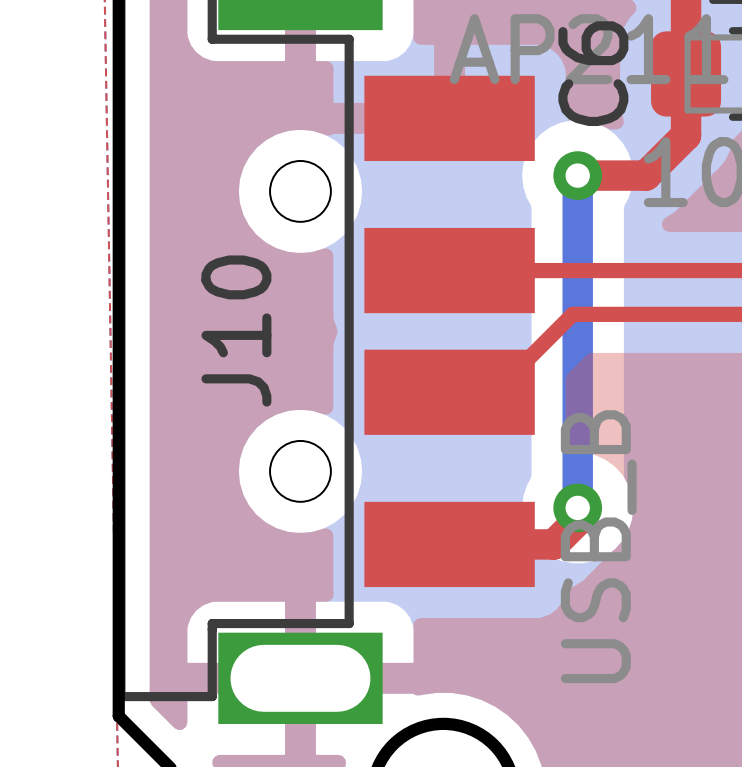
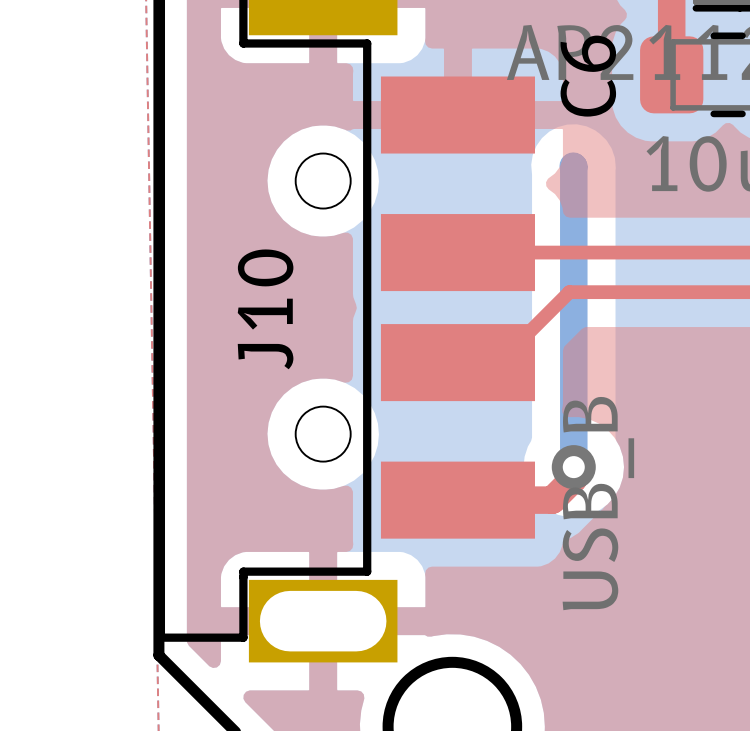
top track: (686, 73) (686, 135) (645, 175) (577, 175) -> none
via: (577, 175) -> none

